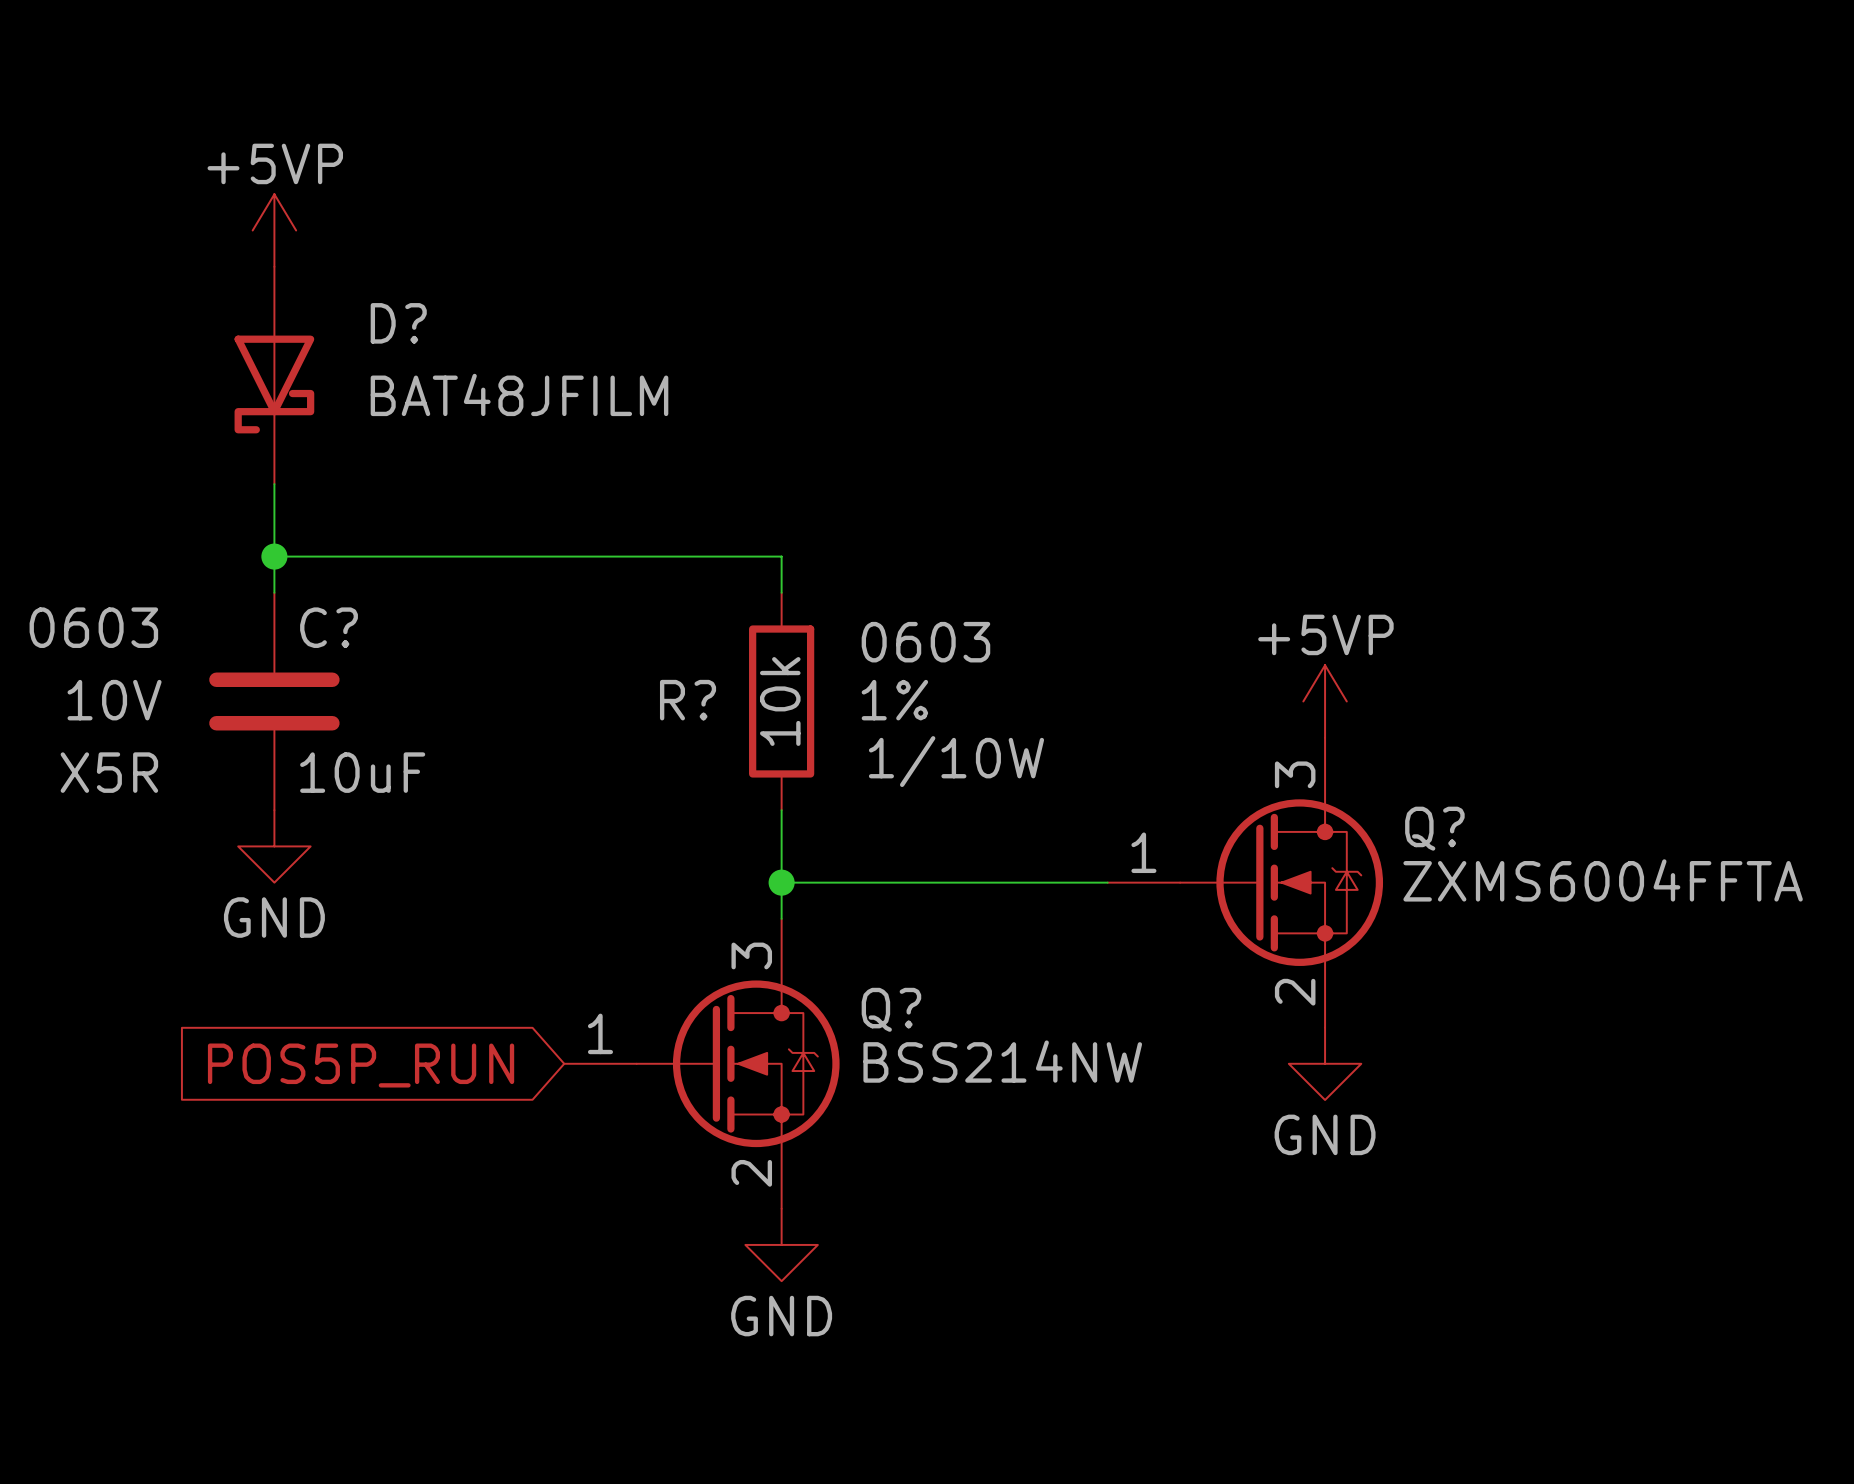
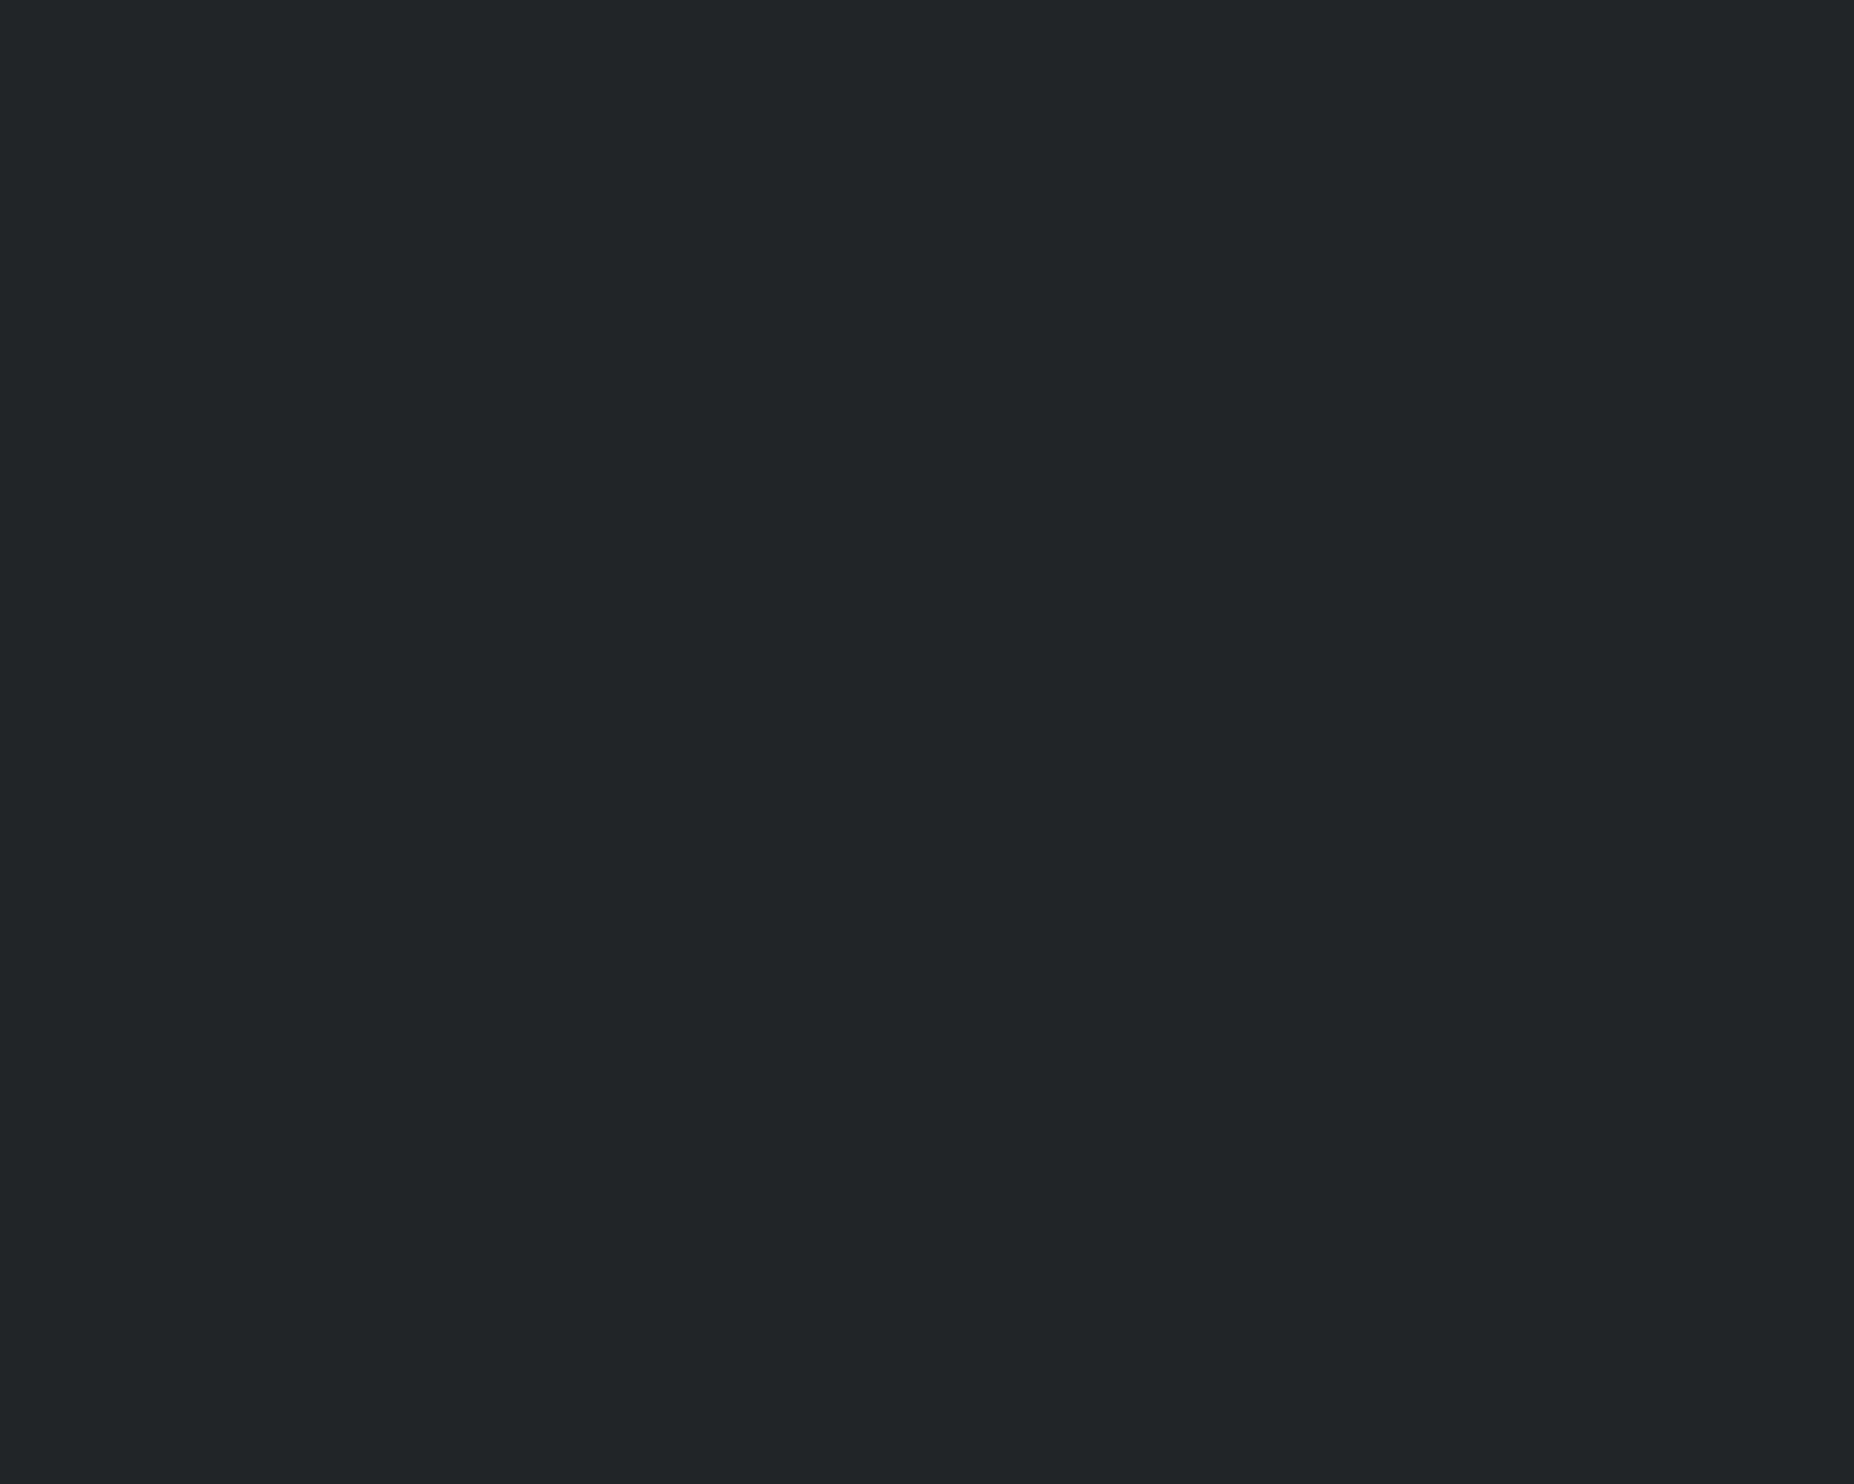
power symbol: +5VP (274, 230) -> none
D?: BAT48JFILM (274, 375) -> none
wire: (274, 484) (274, 592) -> none
wire: (274, 556) (781, 556) (781, 592) -> none
junction: (274, 556) -> none
C?: 10uF (274, 701) -> none
R?: 10k (781, 701) -> none
power symbol: +5VP (1325, 701) -> none
wire: (781, 810) (781, 918) -> none
power symbol: GND (274, 846) -> none
wire: (781, 882) (1107, 882) -> none
junction: (781, 882) -> none
Q?: ZXMS6004FFTA (1245, 882) -> none
Q?: BSS214NW (701, 1063) -> none
power symbol: GND (1325, 1063) -> none
global label: POS5P_RUN (361, 1065) -> none
power symbol: GND (781, 1244) -> none

